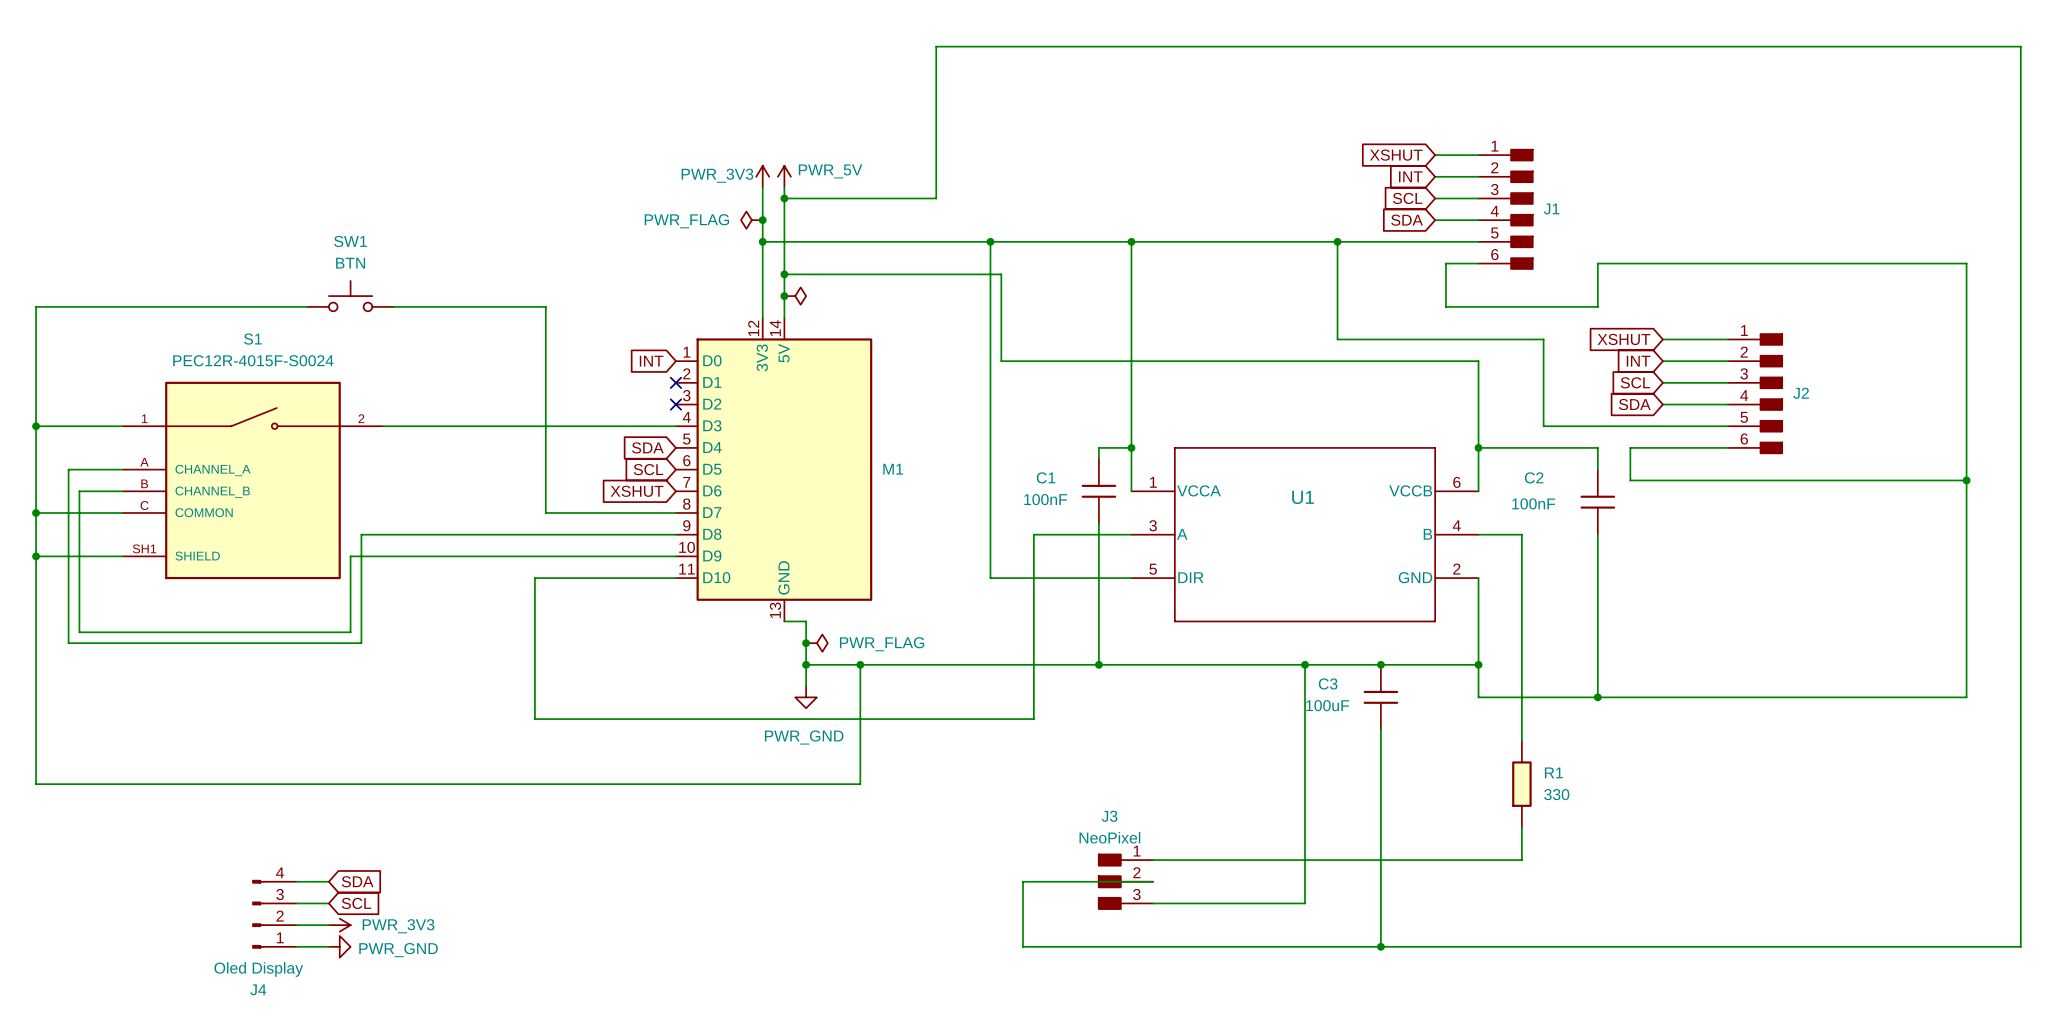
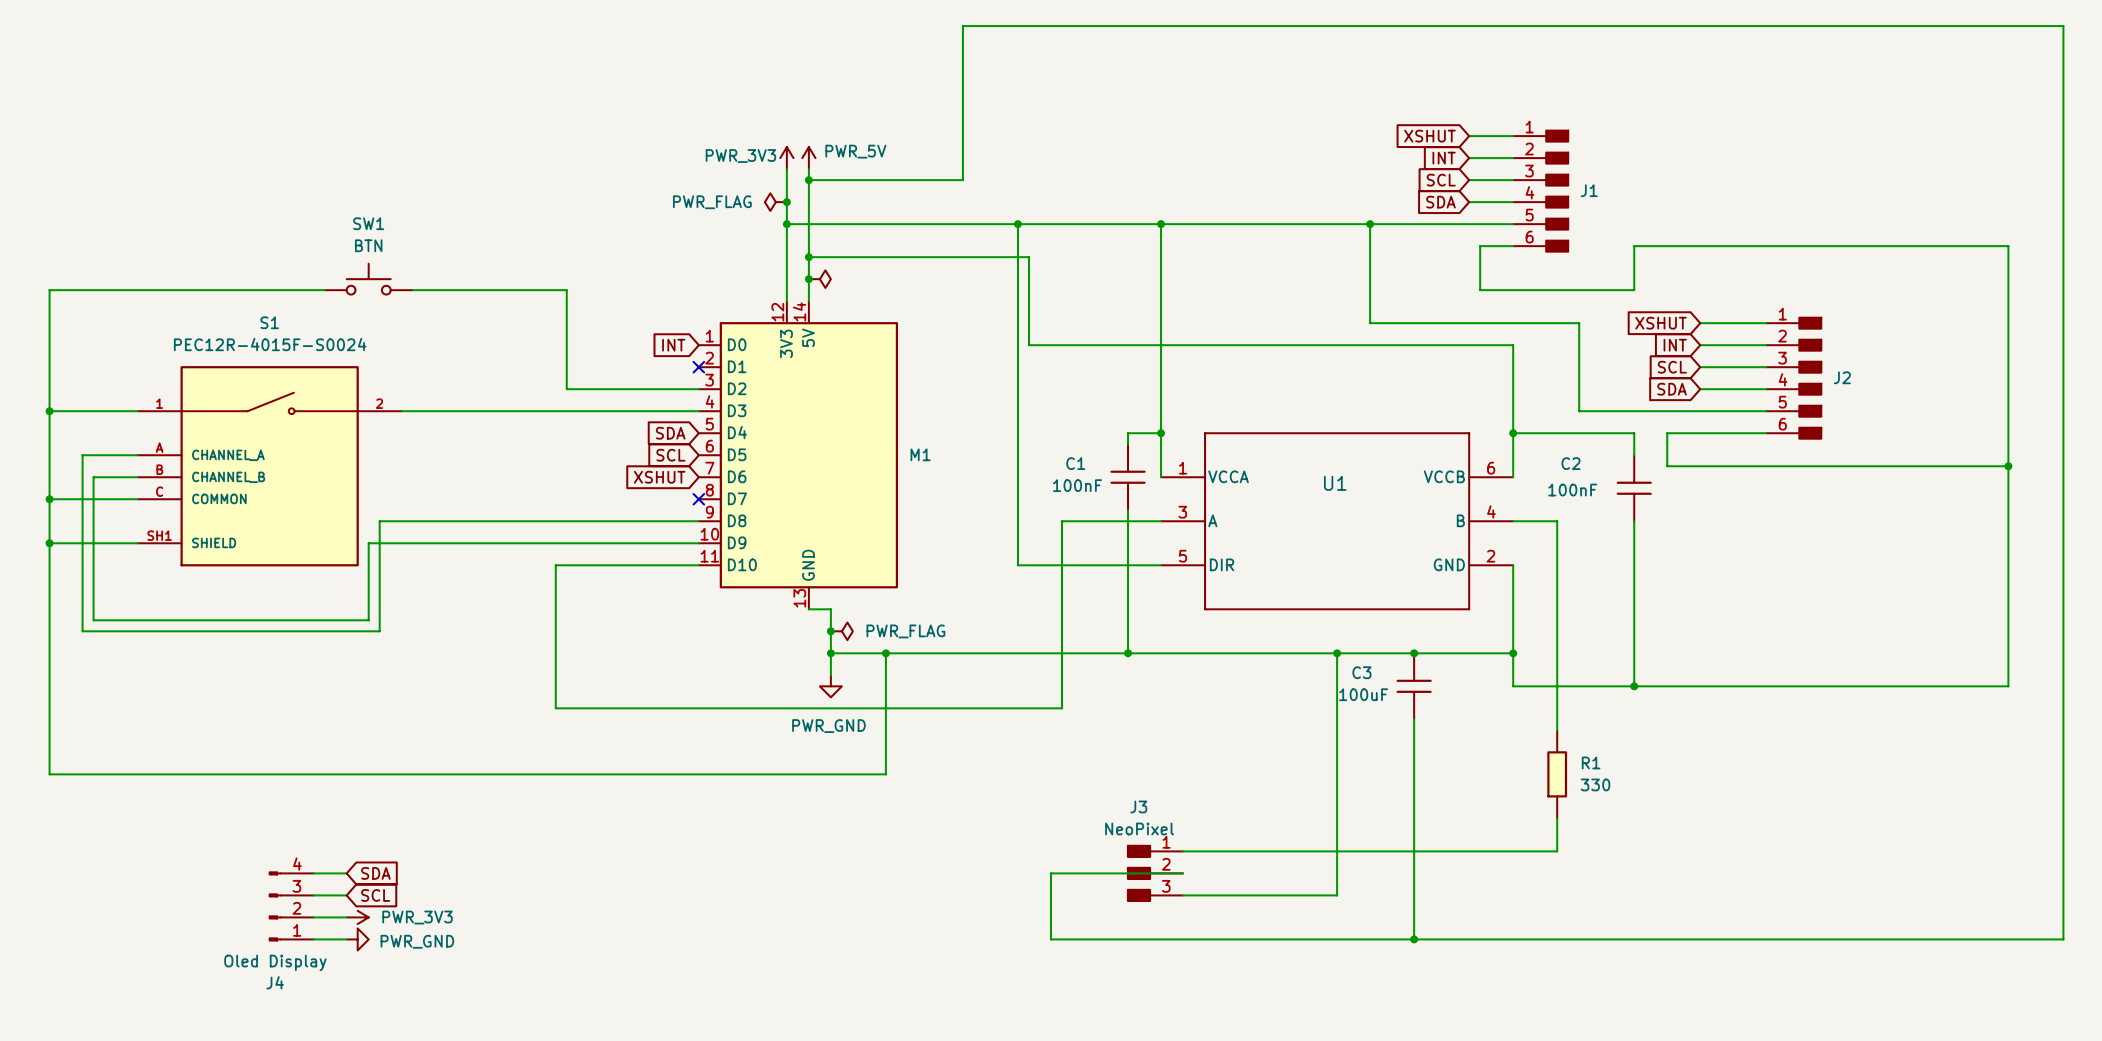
wire: (545, 404) (545, 513) (675, 513) -> (566, 389) (698, 389)
no-connect mark: (675, 404) -> none
no-connect mark: none -> (698, 499)

